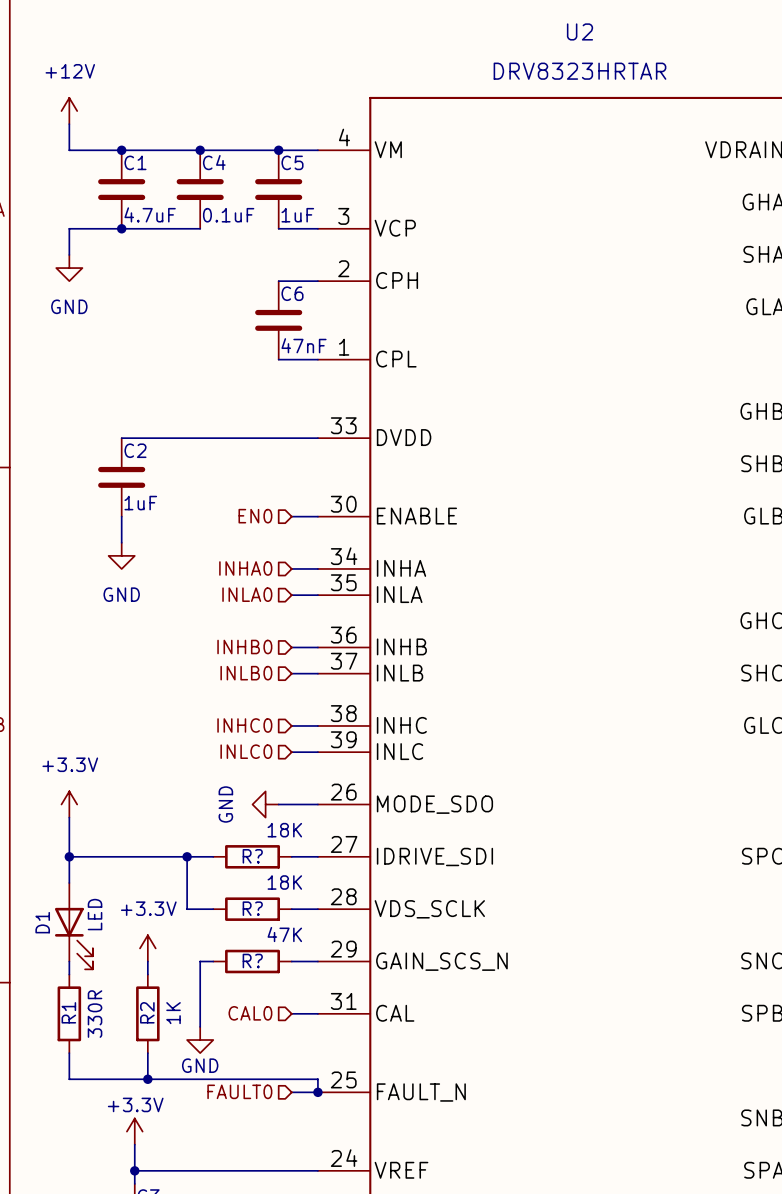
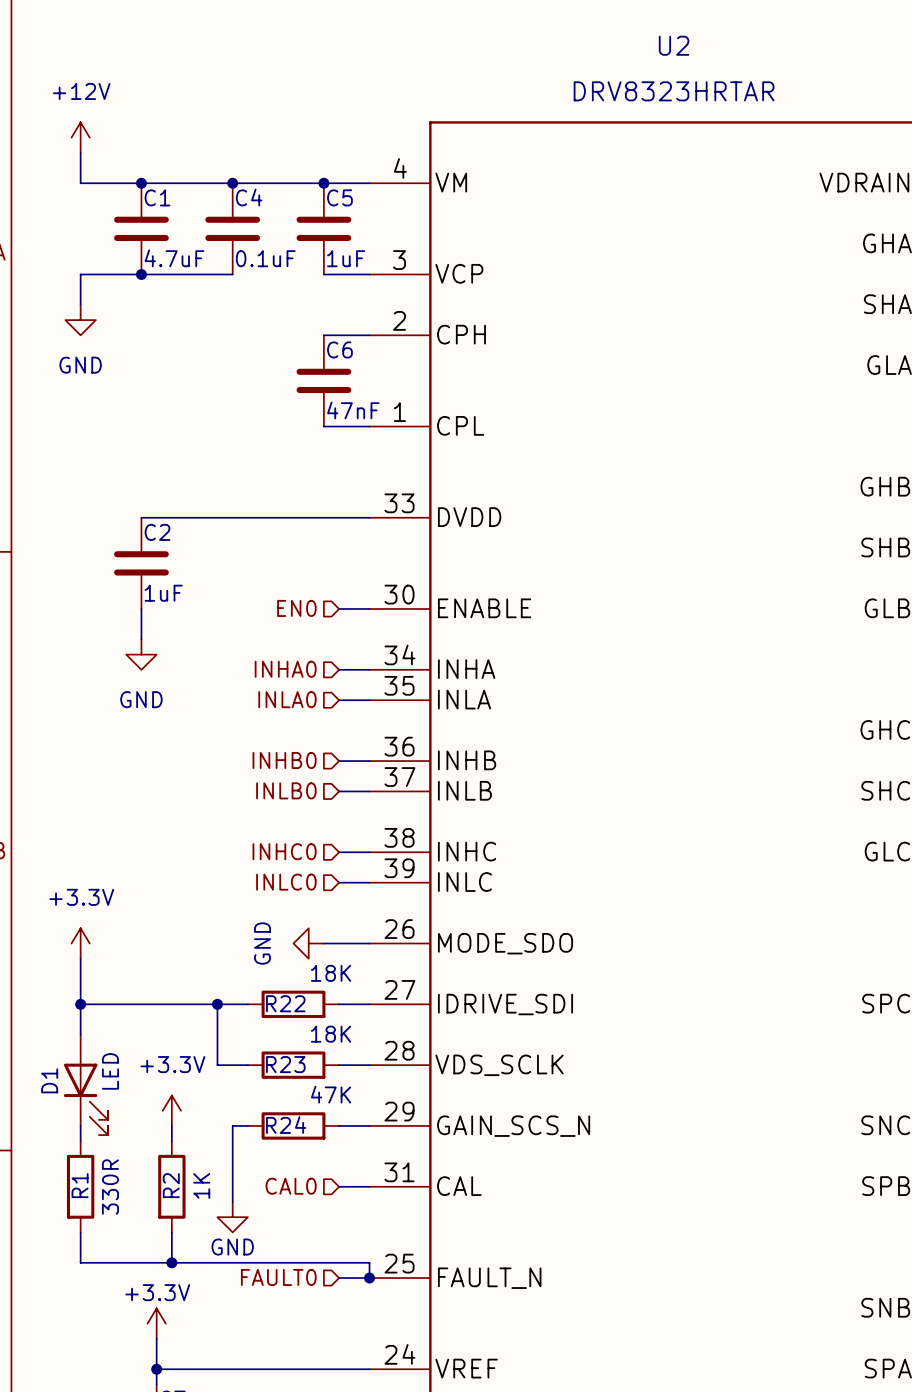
R? name: R? (252, 856) -> R22 (285, 1003)
R? name: R? (252, 908) -> R23 (285, 1064)
R? name: R? (252, 961) -> R24 (286, 1125)

